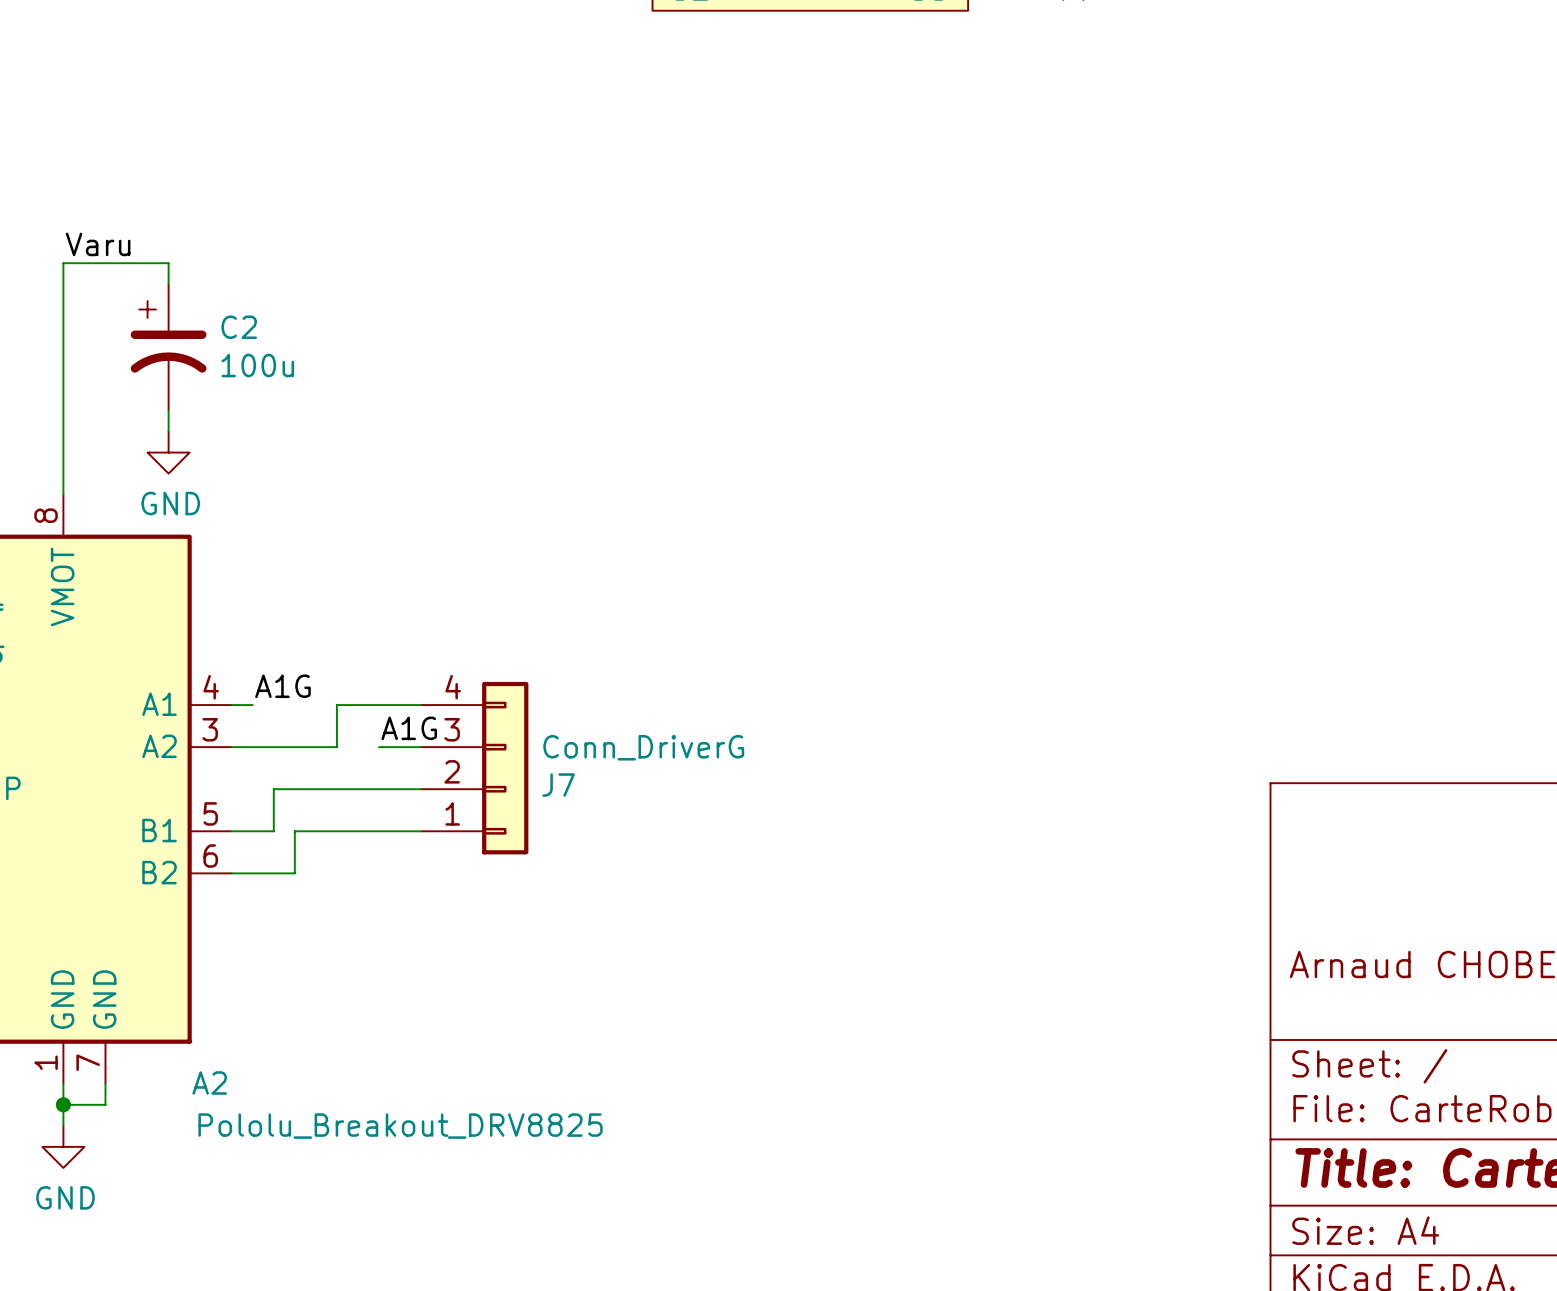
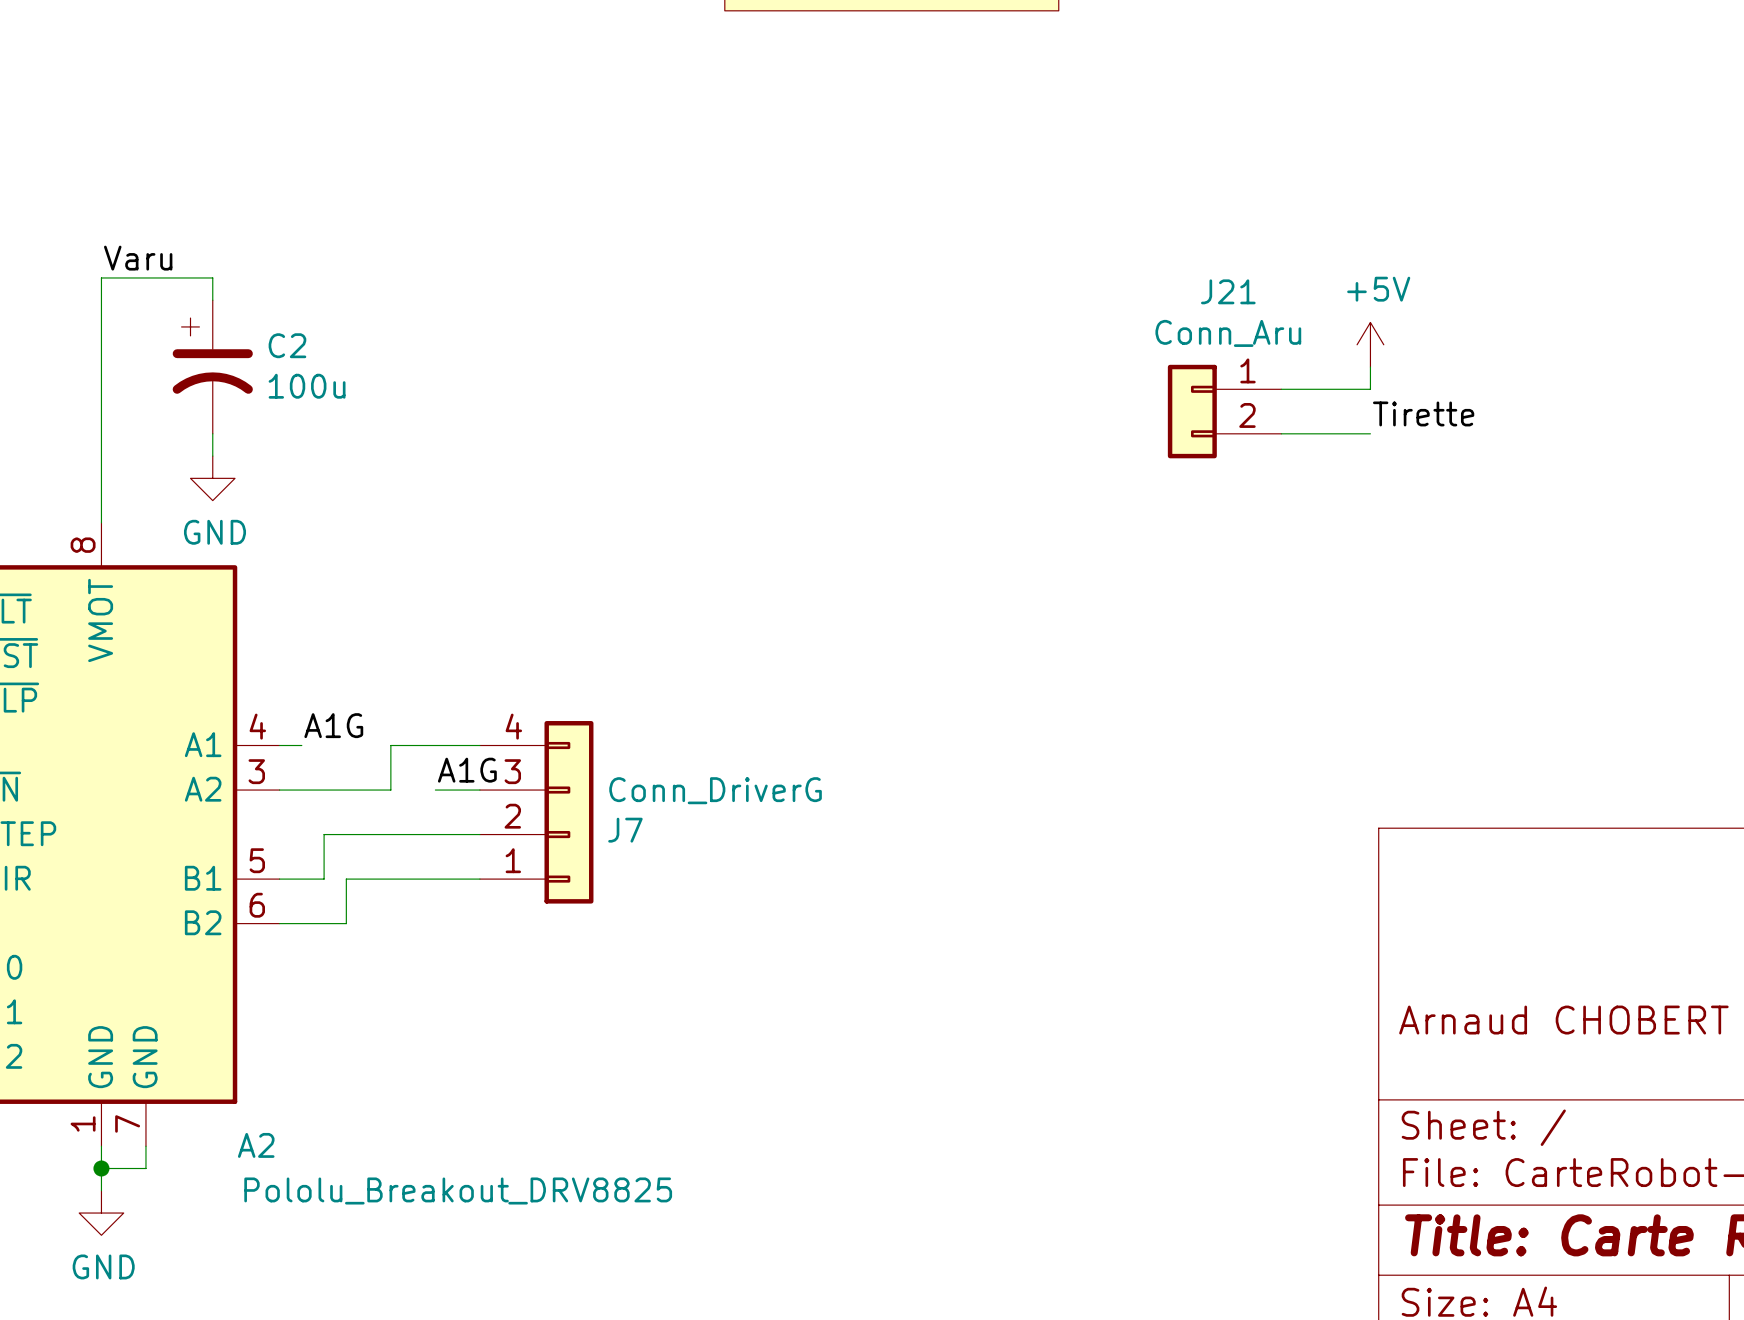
power symbol: none -> +5V (1370, 344)
wire: none -> (1370, 367) (1370, 389) (1281, 389)
J21: none -> Conn_Aru (1224, 411)
label: none -> Tirette (1423, 413)
wire: none -> (1281, 433) (1370, 433)

